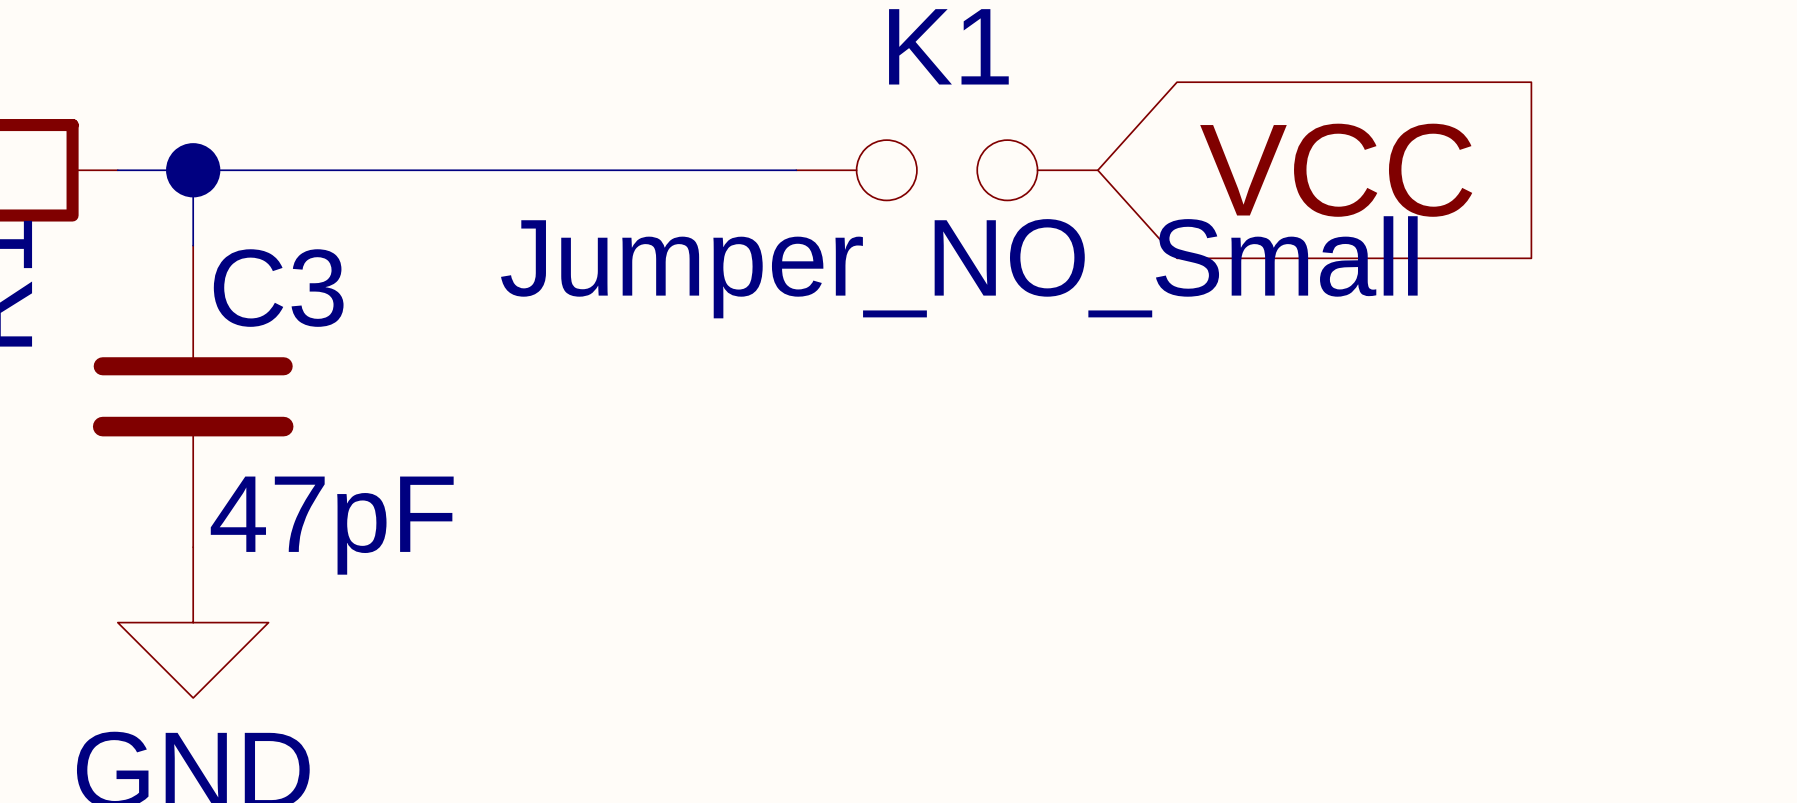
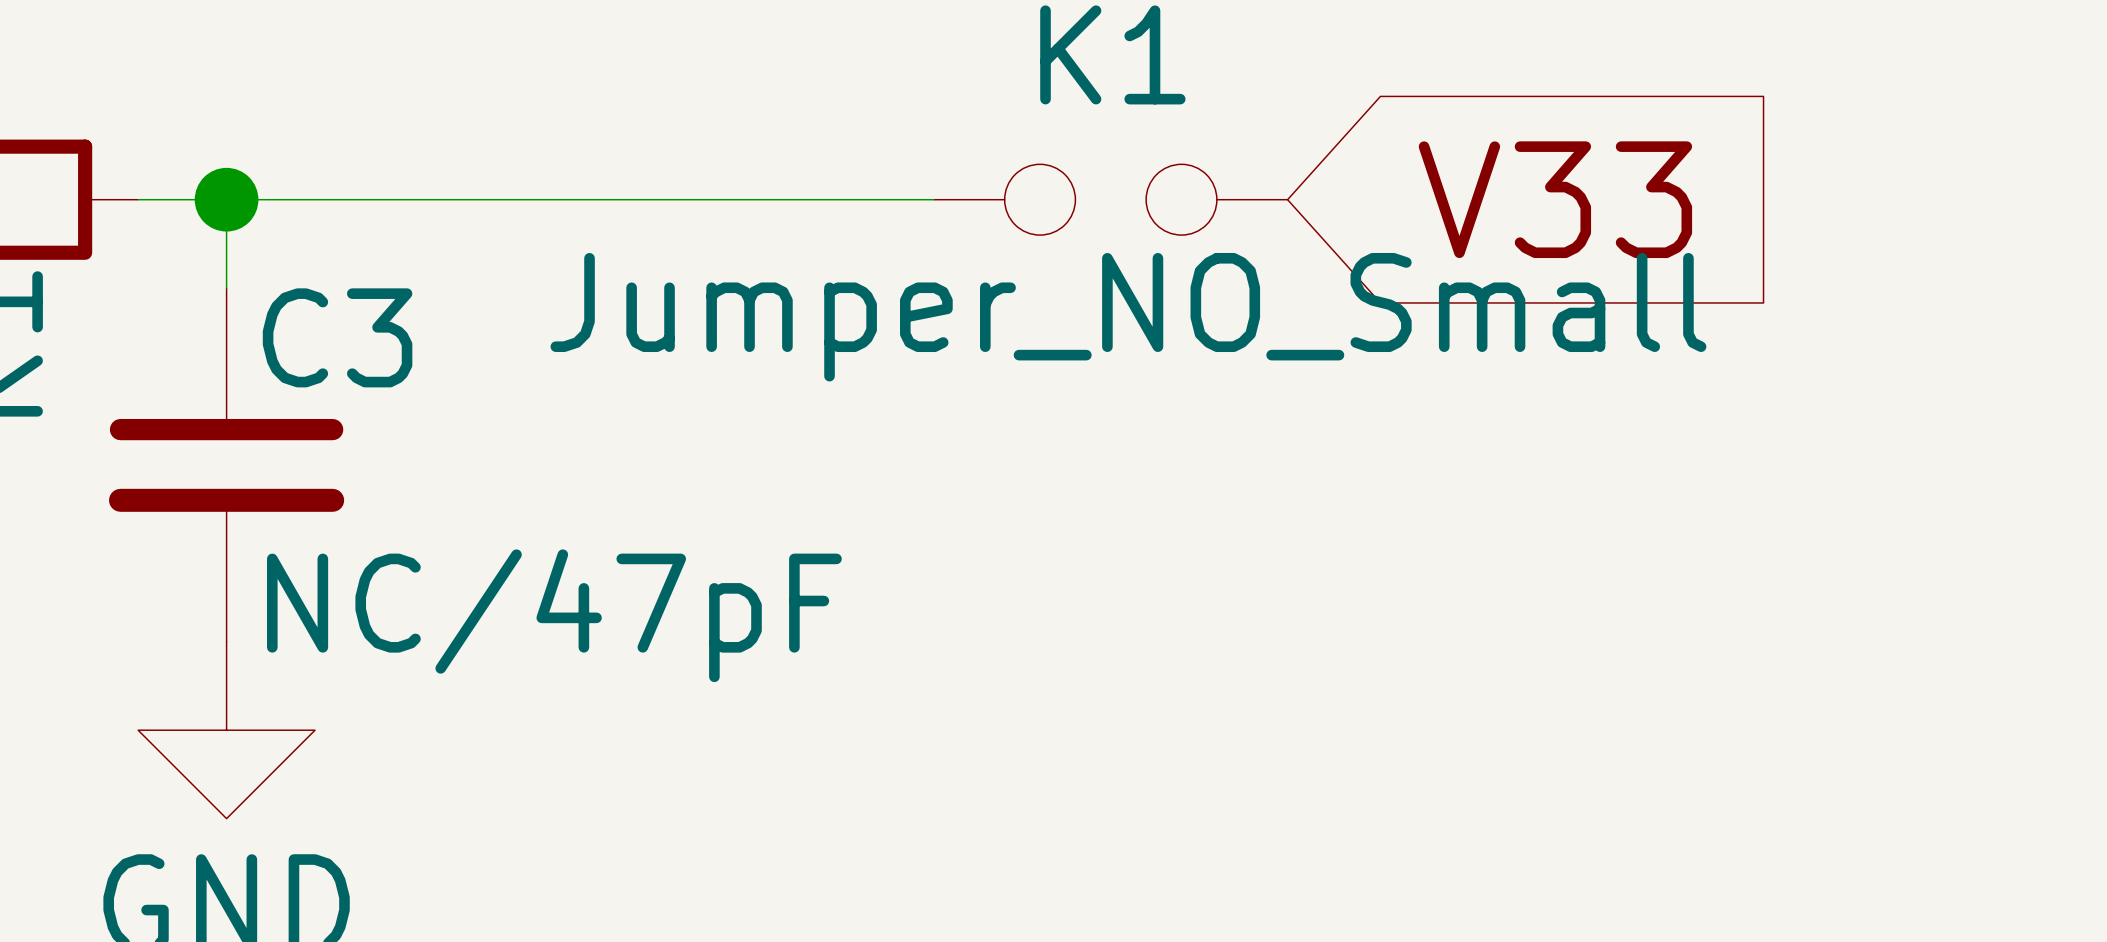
global label: VCC (1336, 170) -> V33 (1555, 199)
C3 value: 47pF (332, 525) -> NC/47pF (554, 615)

